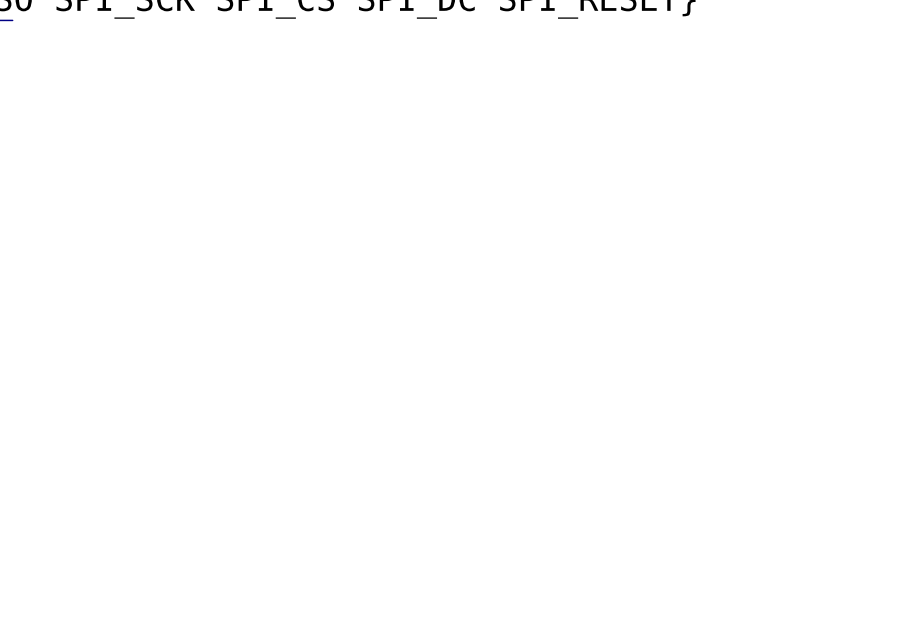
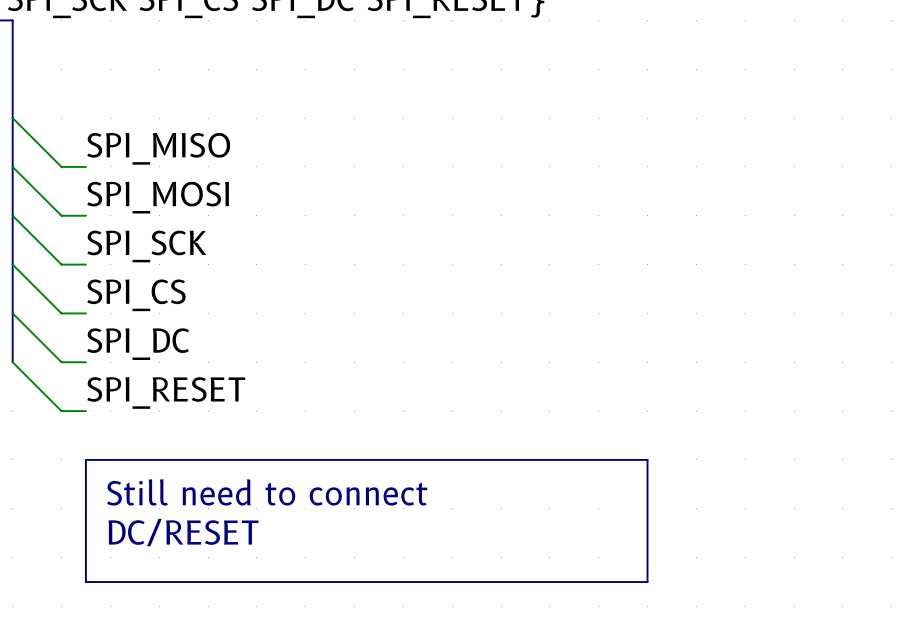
bus: none -> (12, 20) (12, 362)
wire: none -> (12, 118) (61, 166) (85, 166)
label: none -> SPI_MISO (158, 148)
wire: none -> (12, 166) (61, 215) (85, 215)
label: none -> SPI_MOSI (158, 197)
wire: none -> (12, 215) (61, 264) (85, 264)
label: none -> SPI_SCK (146, 246)
wire: none -> (12, 264) (61, 313) (85, 313)
label: none -> SPI_CS (136, 295)
wire: none -> (12, 313) (61, 362) (85, 362)
label: none -> SPI_DC (138, 344)
wire: none -> (12, 362) (61, 411) (85, 411)
label: none -> SPI_RESET (166, 392)
line: none -> (85, 459) (647, 459) (647, 582) (85, 582) (85, 459)
text: none -> Still need to connect (267, 492)
text: none -> DC/RESET (183, 532)

